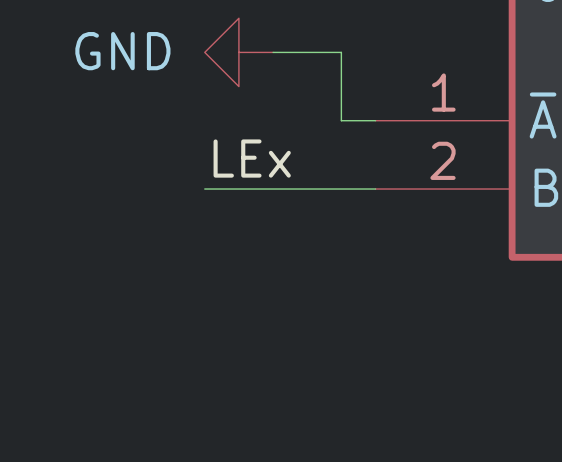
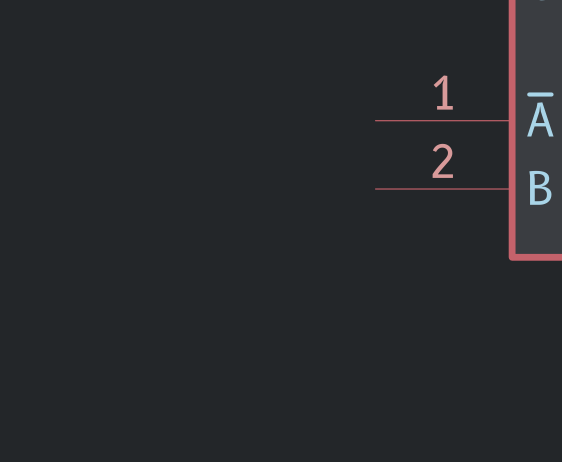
power symbol: GND (238, 52) -> none
wire: (273, 52) (341, 52) (341, 120) (375, 120) -> none
label: LEx (252, 158) -> none
wire: (204, 189) (375, 189) -> none

